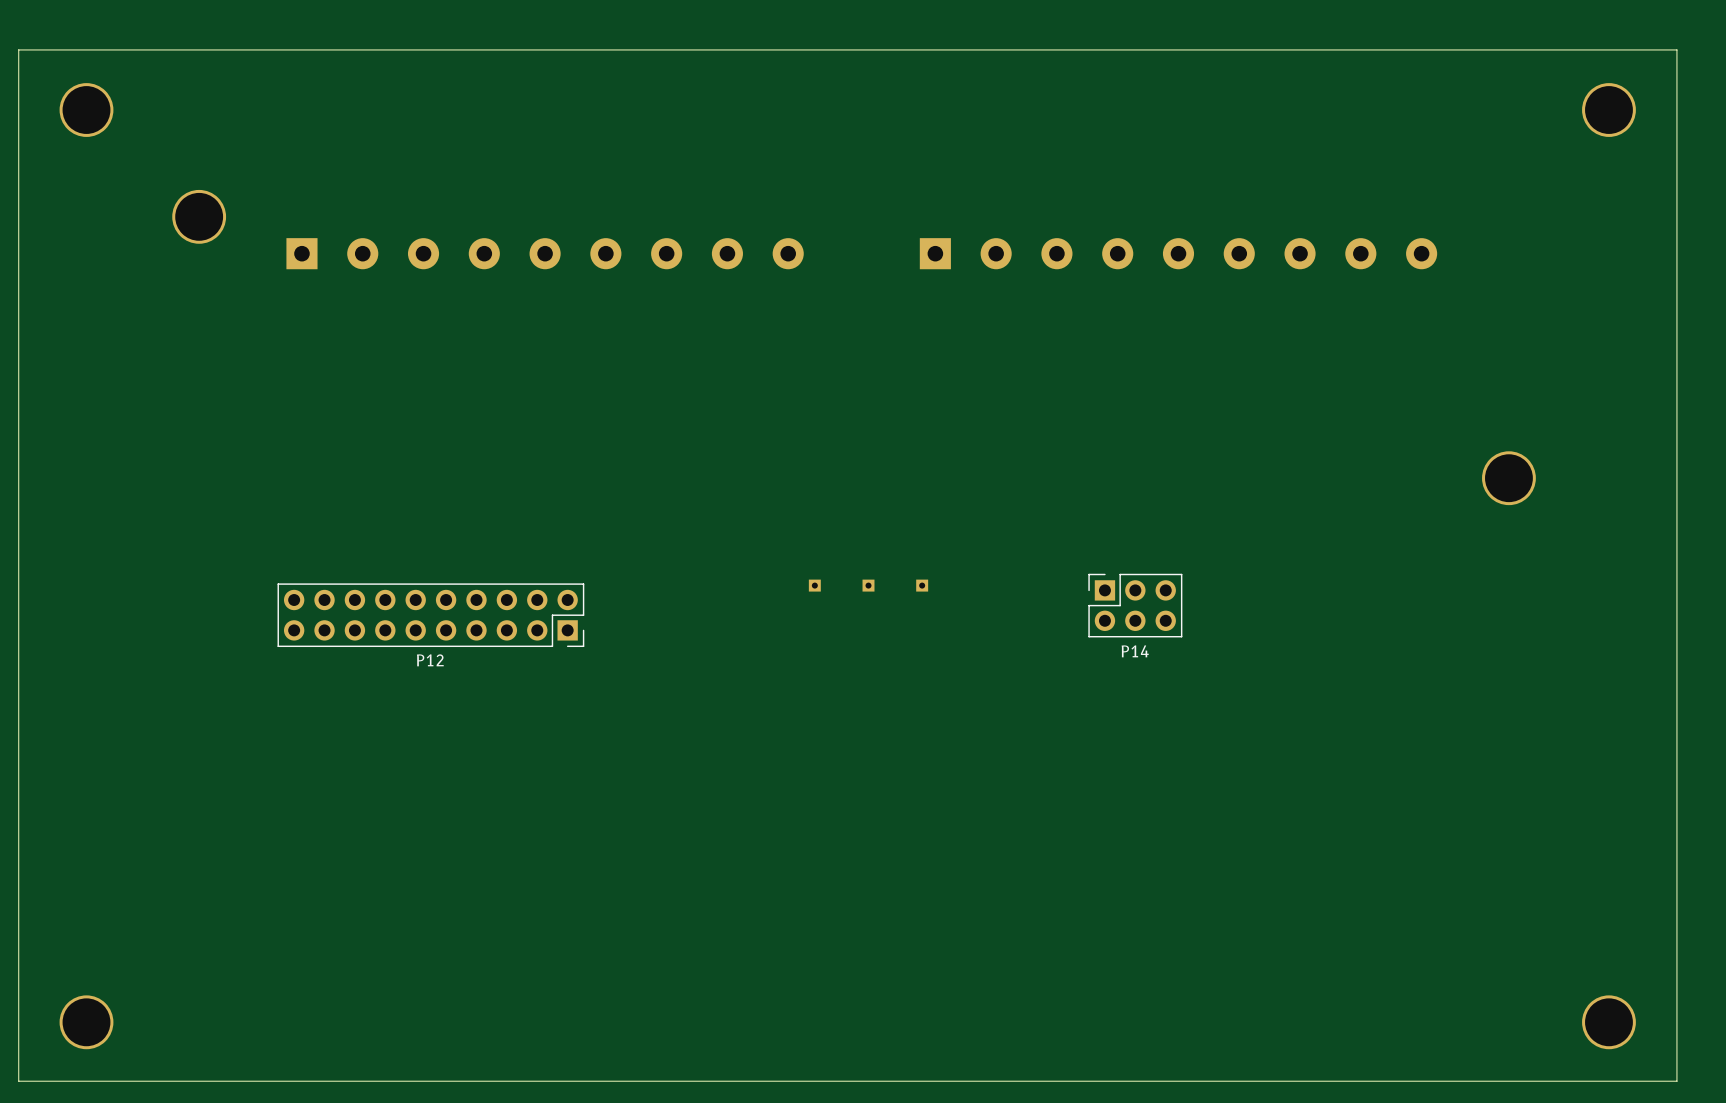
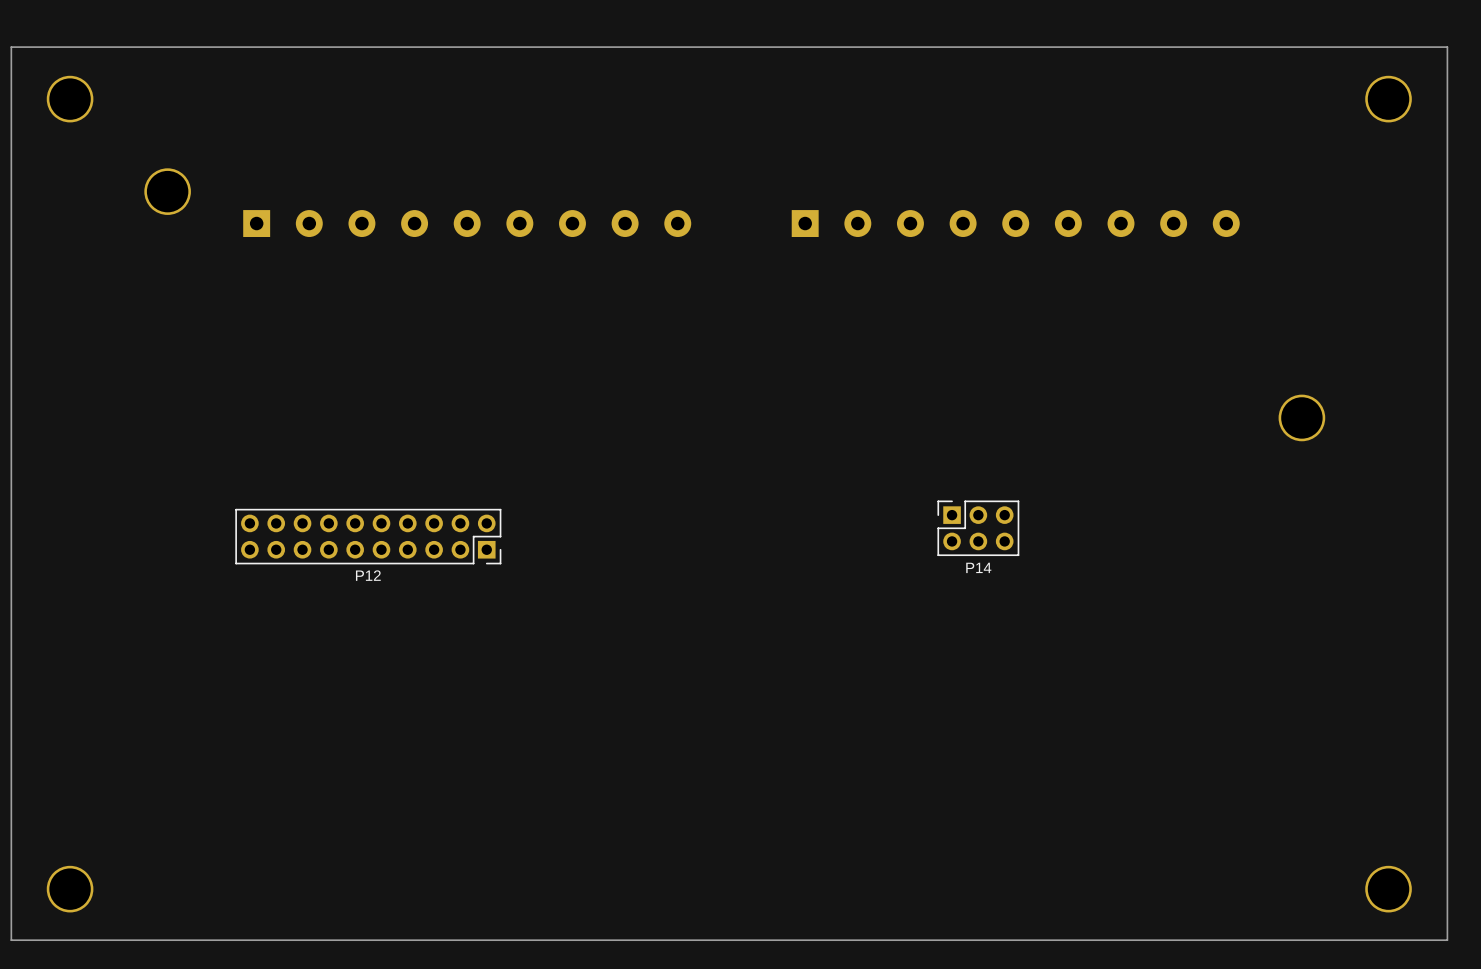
part: (814, 585) -> none
part: (868, 585) -> none
part: (922, 585) -> none

